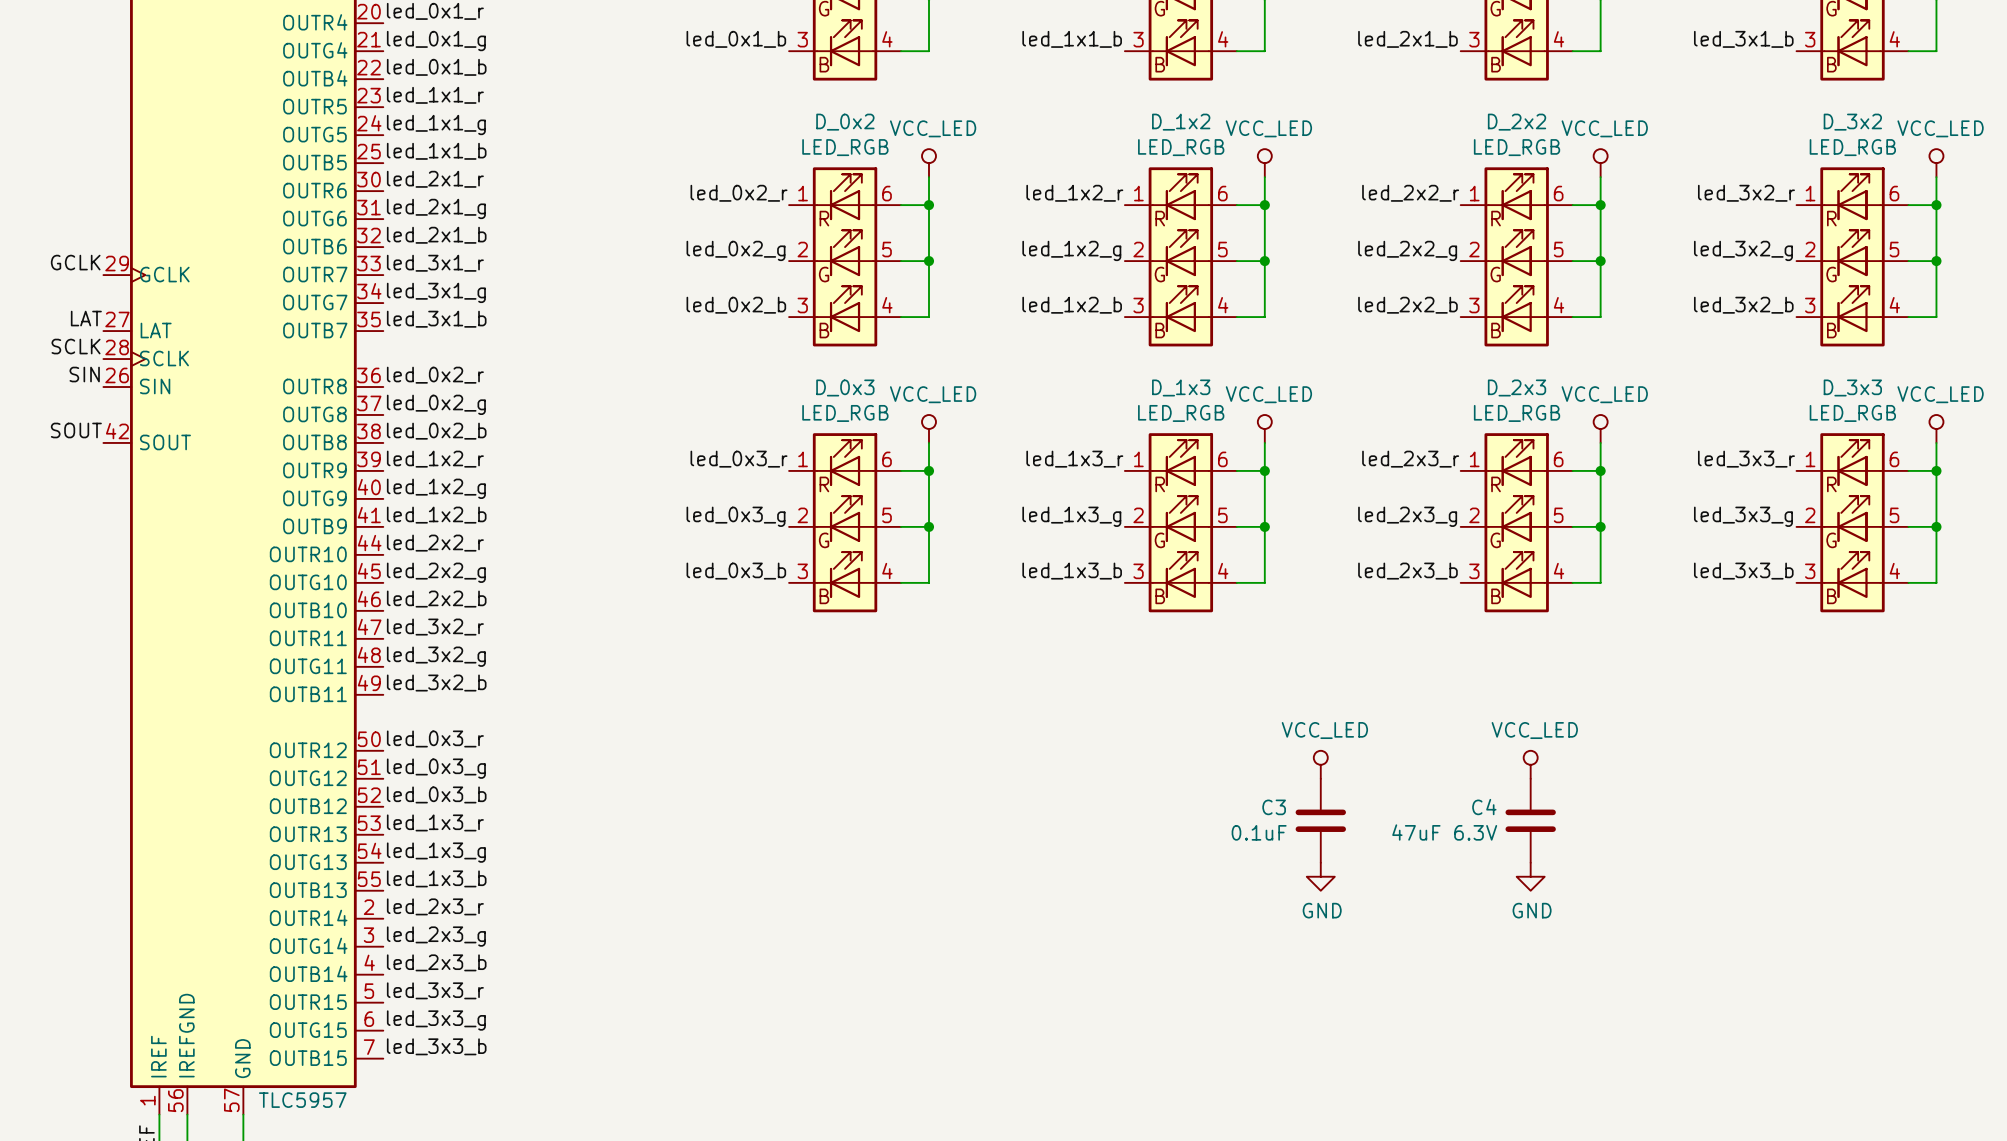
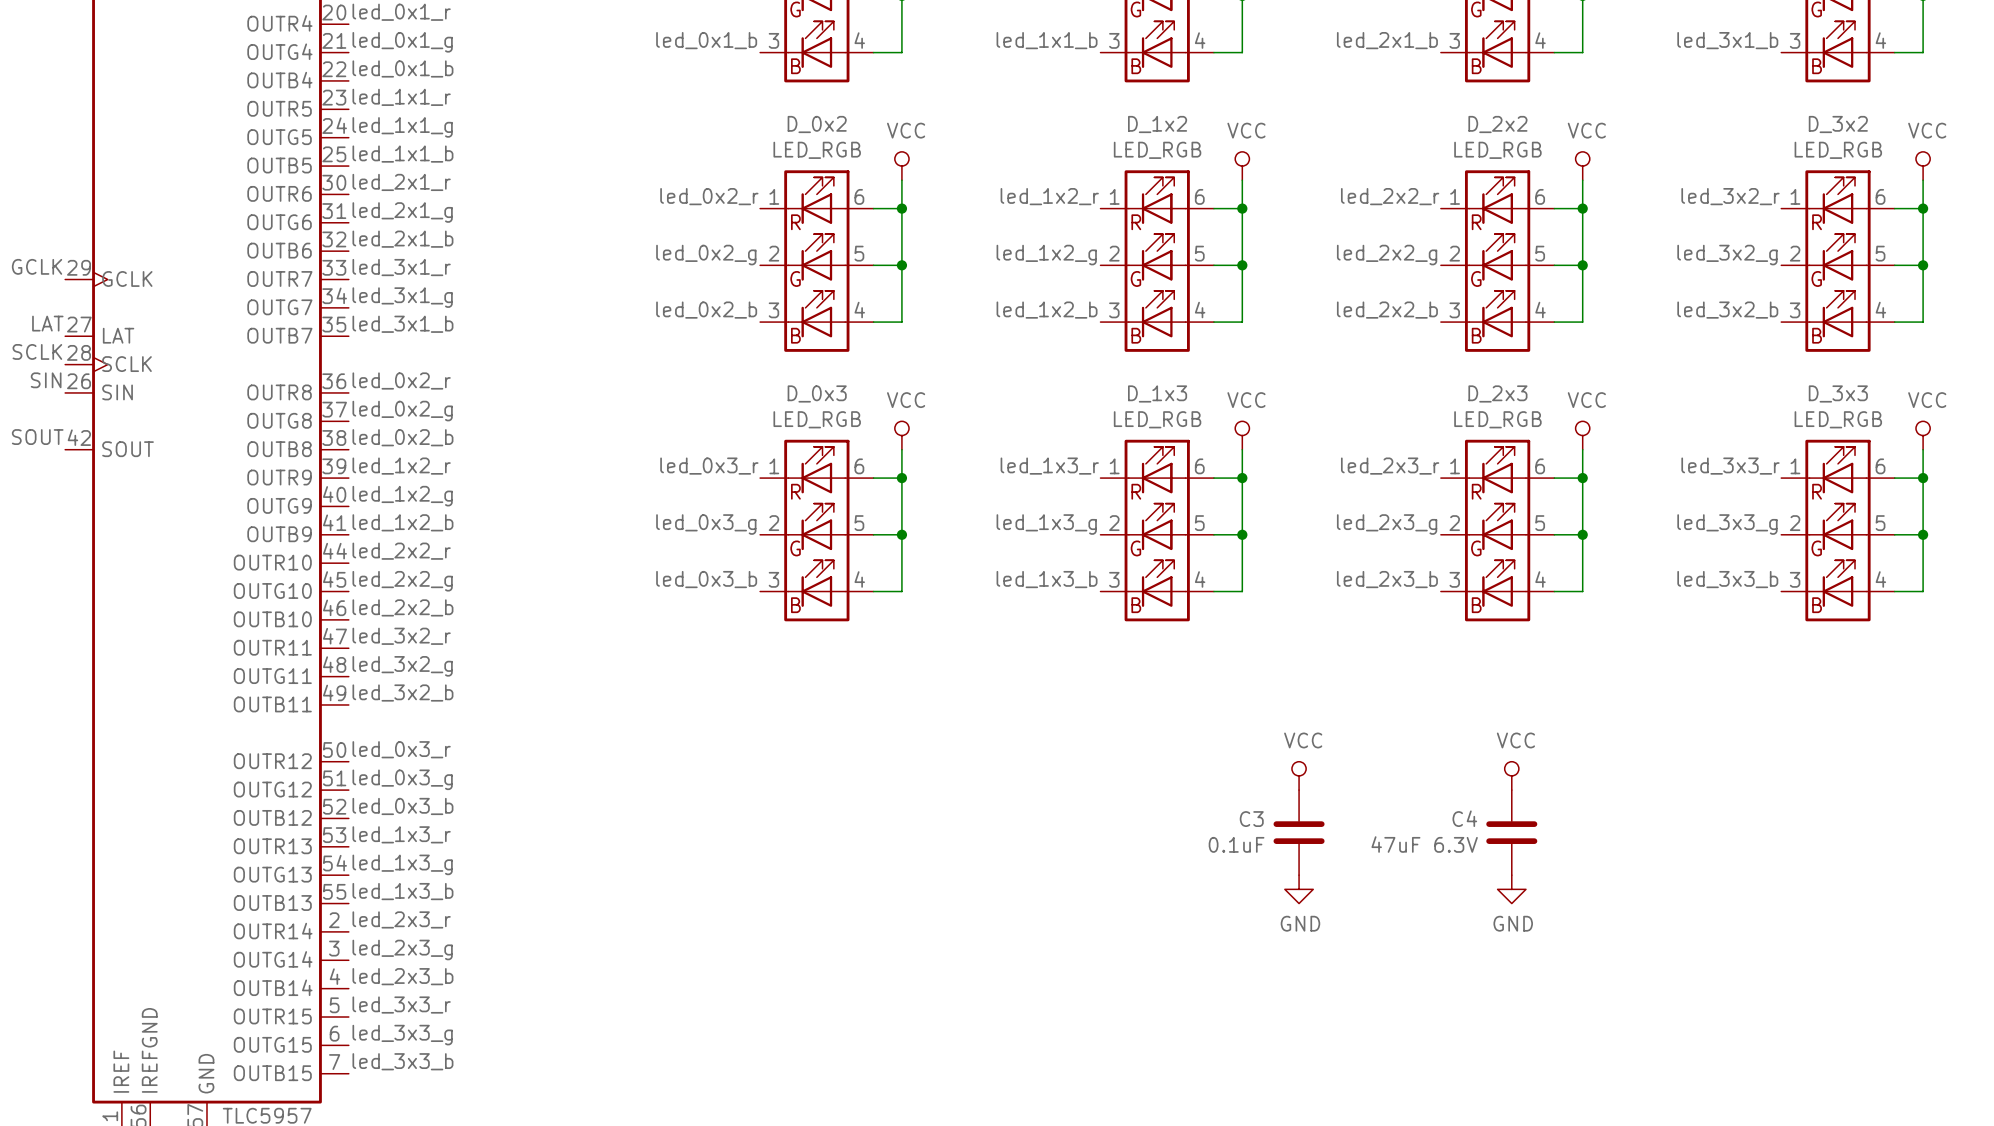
power symbol: VCC_LED (929, 163) -> VCC (901, 166)
power symbol: VCC_LED (1264, 163) -> VCC (1242, 166)
power symbol: VCC_LED (1600, 163) -> VCC (1582, 166)
power symbol: VCC_LED (1936, 163) -> VCC (1923, 166)
power symbol: VCC_LED (929, 428) -> VCC (901, 435)
power symbol: VCC_LED (1264, 428) -> VCC (1242, 435)
power symbol: VCC_LED (1600, 428) -> VCC (1582, 435)
power symbol: VCC_LED (1936, 428) -> VCC (1923, 435)
power symbol: VCC_LED (1320, 764) -> VCC (1299, 775)
power symbol: VCC_LED (1530, 764) -> VCC (1511, 775)

